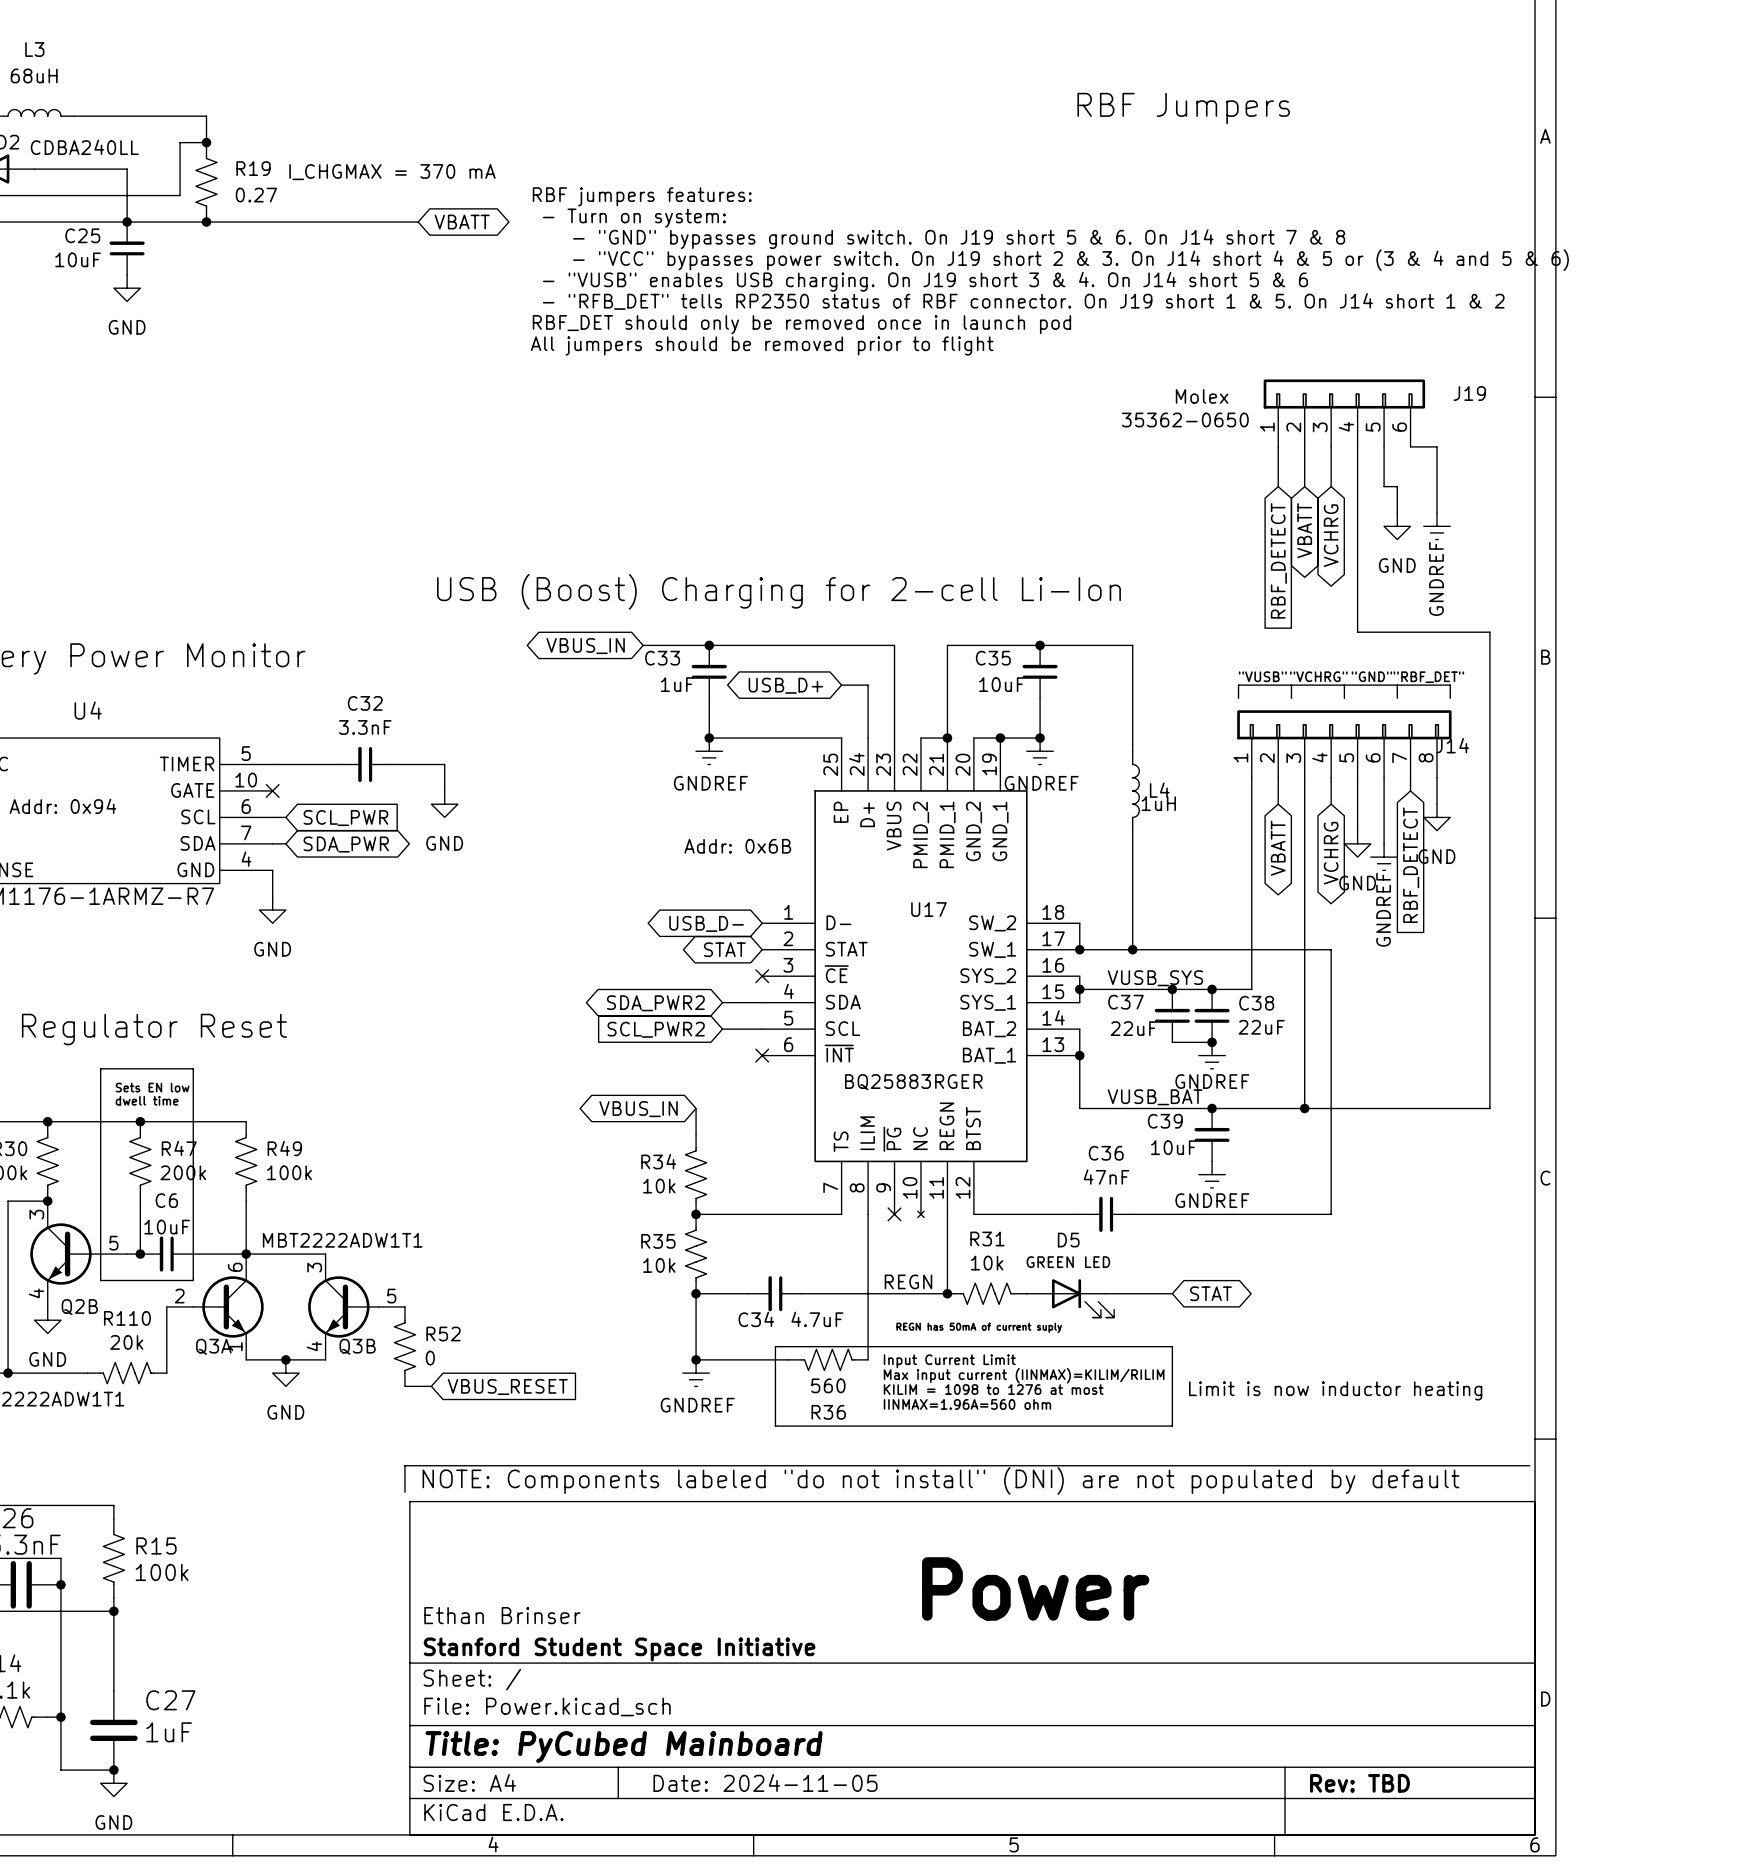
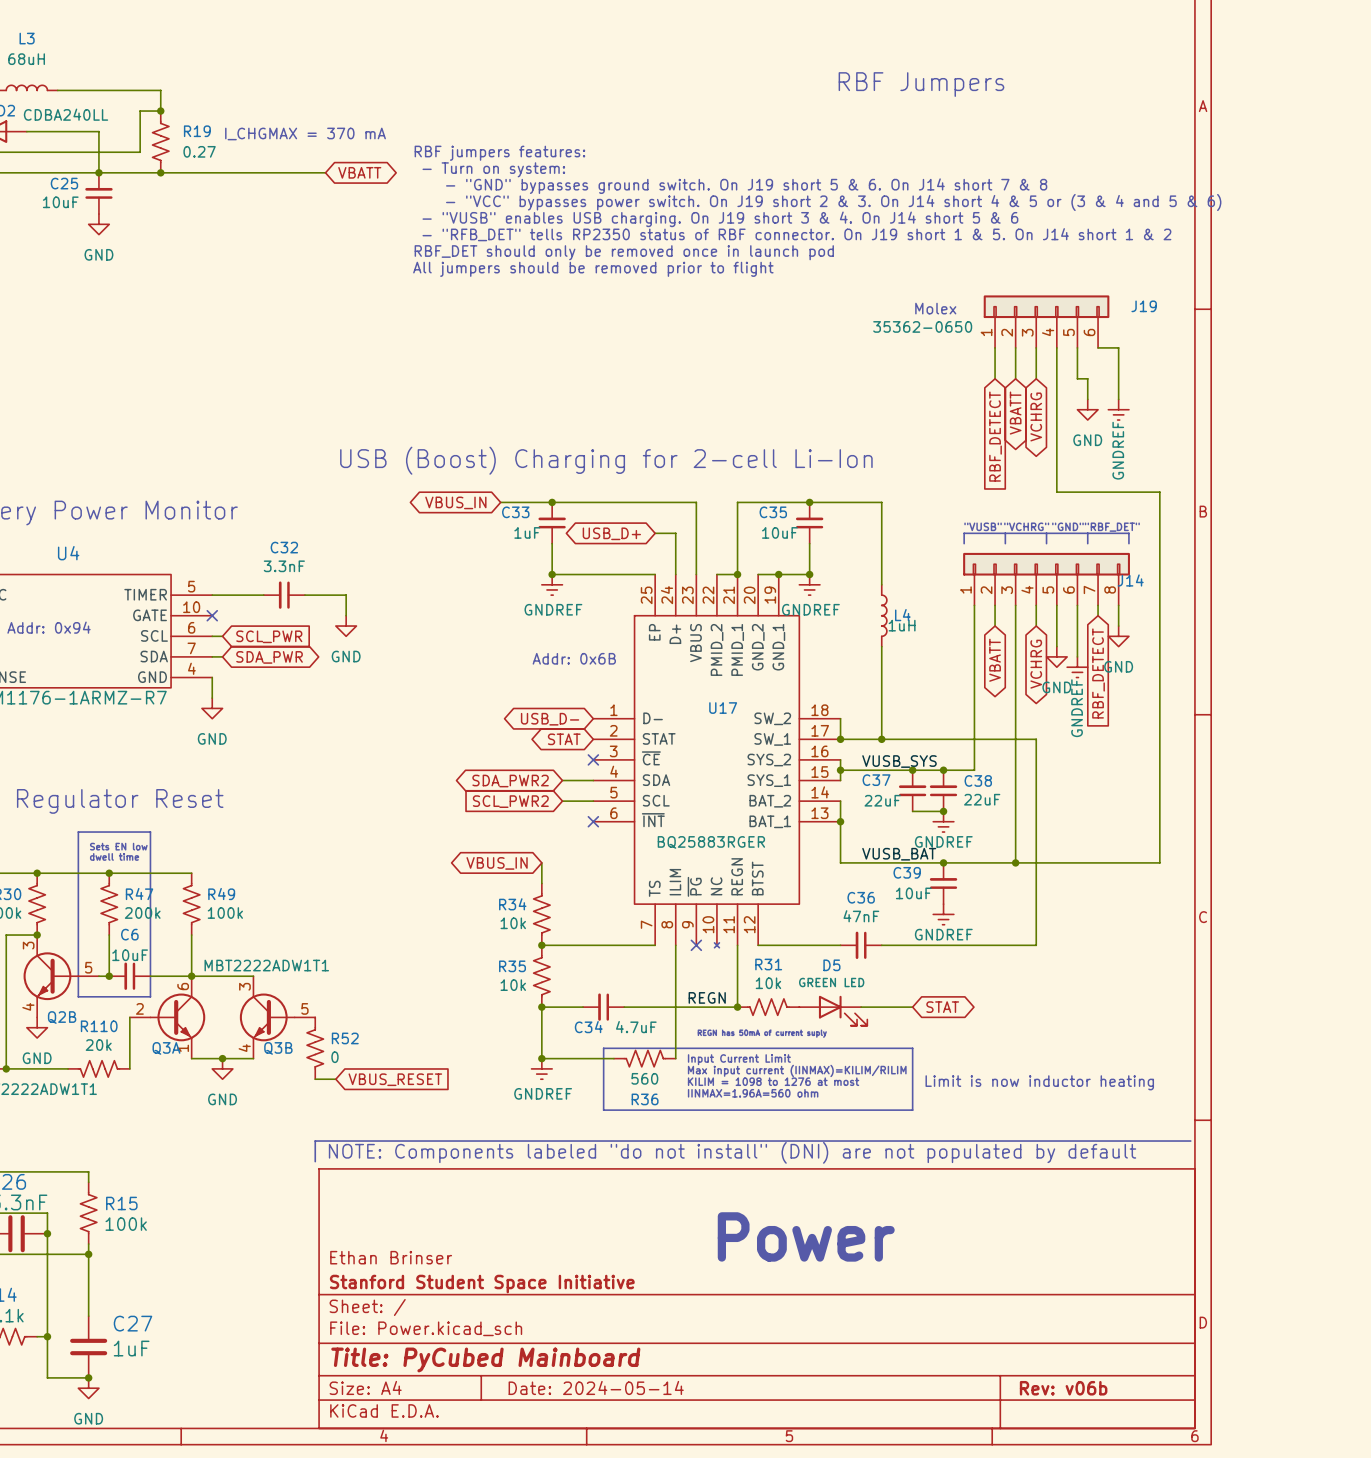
title block: Date: 2024-11-05 (765, 1782) -> Date: 2024-05-14 (596, 1387)
title block: Rev: TBD (1359, 1783) -> Rev: v06b (1063, 1388)

